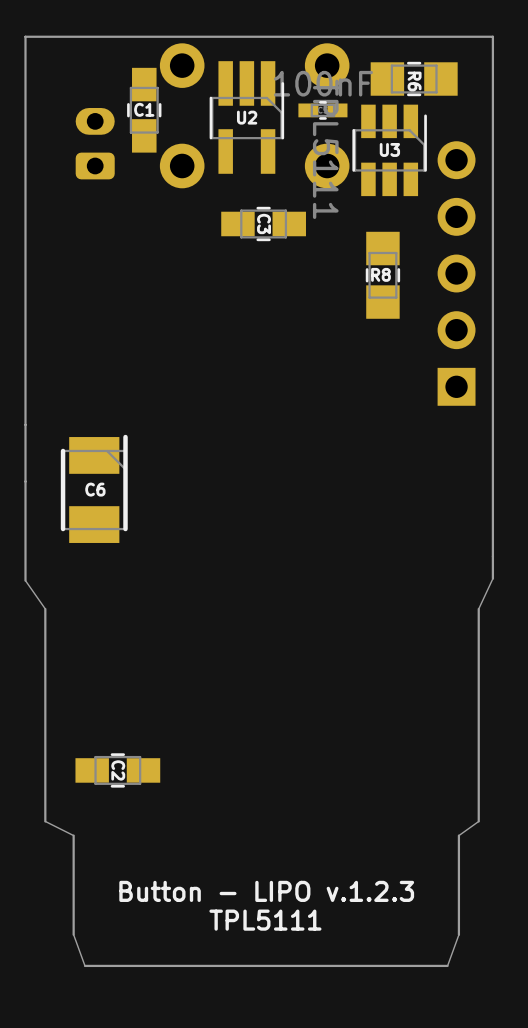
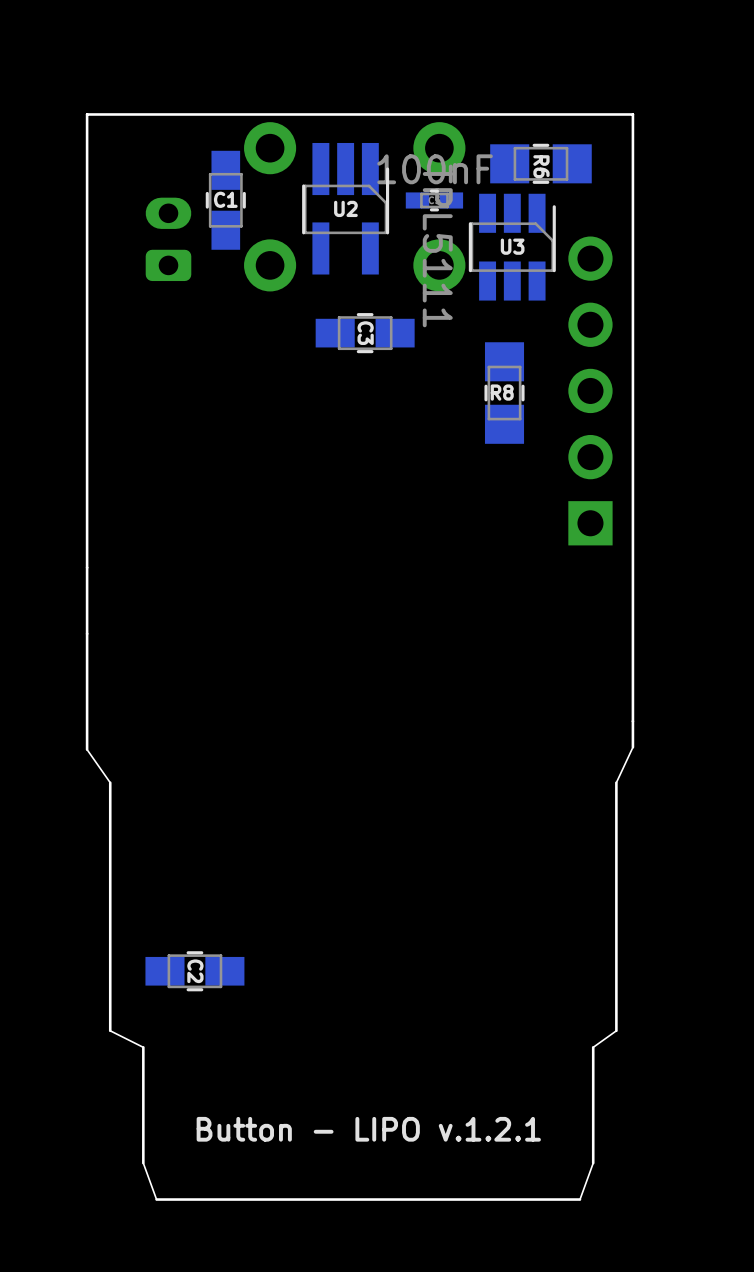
C6: (94, 488) -> none
text: Button - LIPO v.1.2.3 (266, 891) -> Button - LIPO v.1.2.1 (368, 1129)
text: TPL5111 (265, 920) -> none

